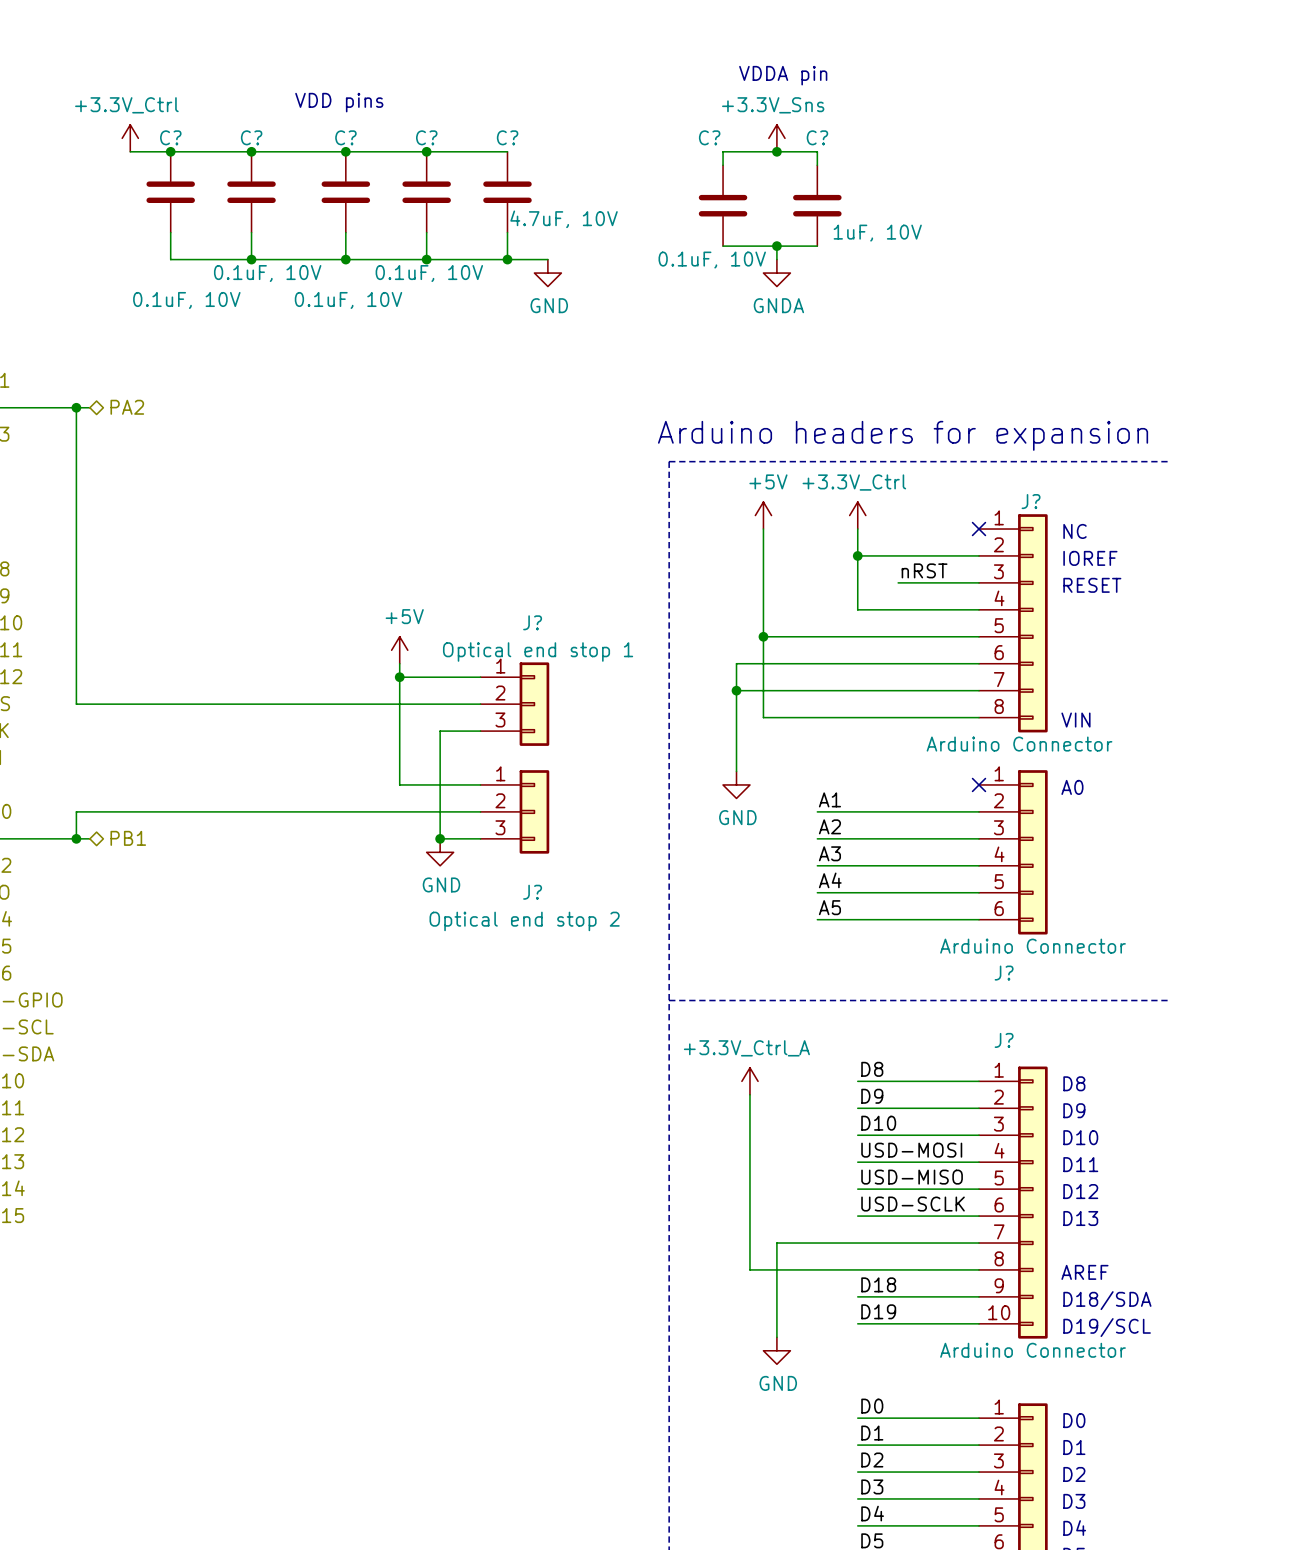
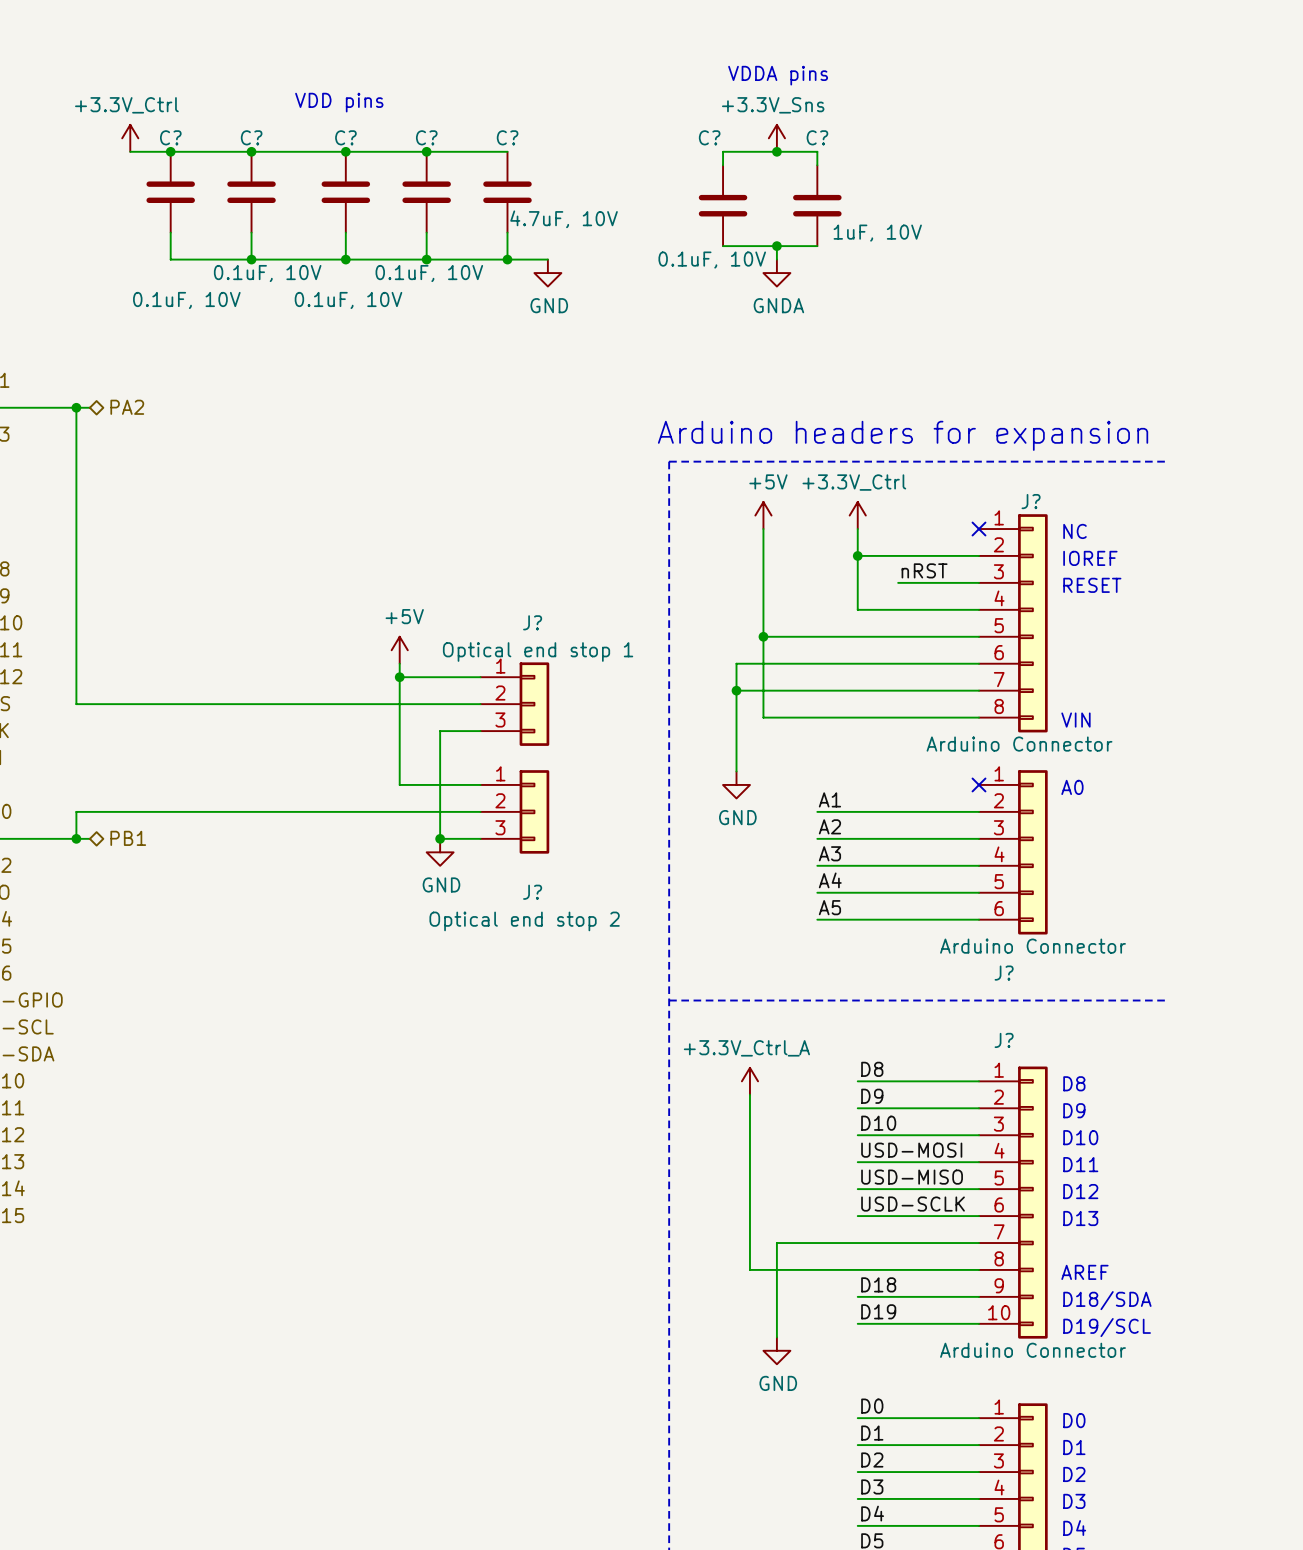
text: VDDA pin (783, 75) -> VDDA pins (778, 75)

